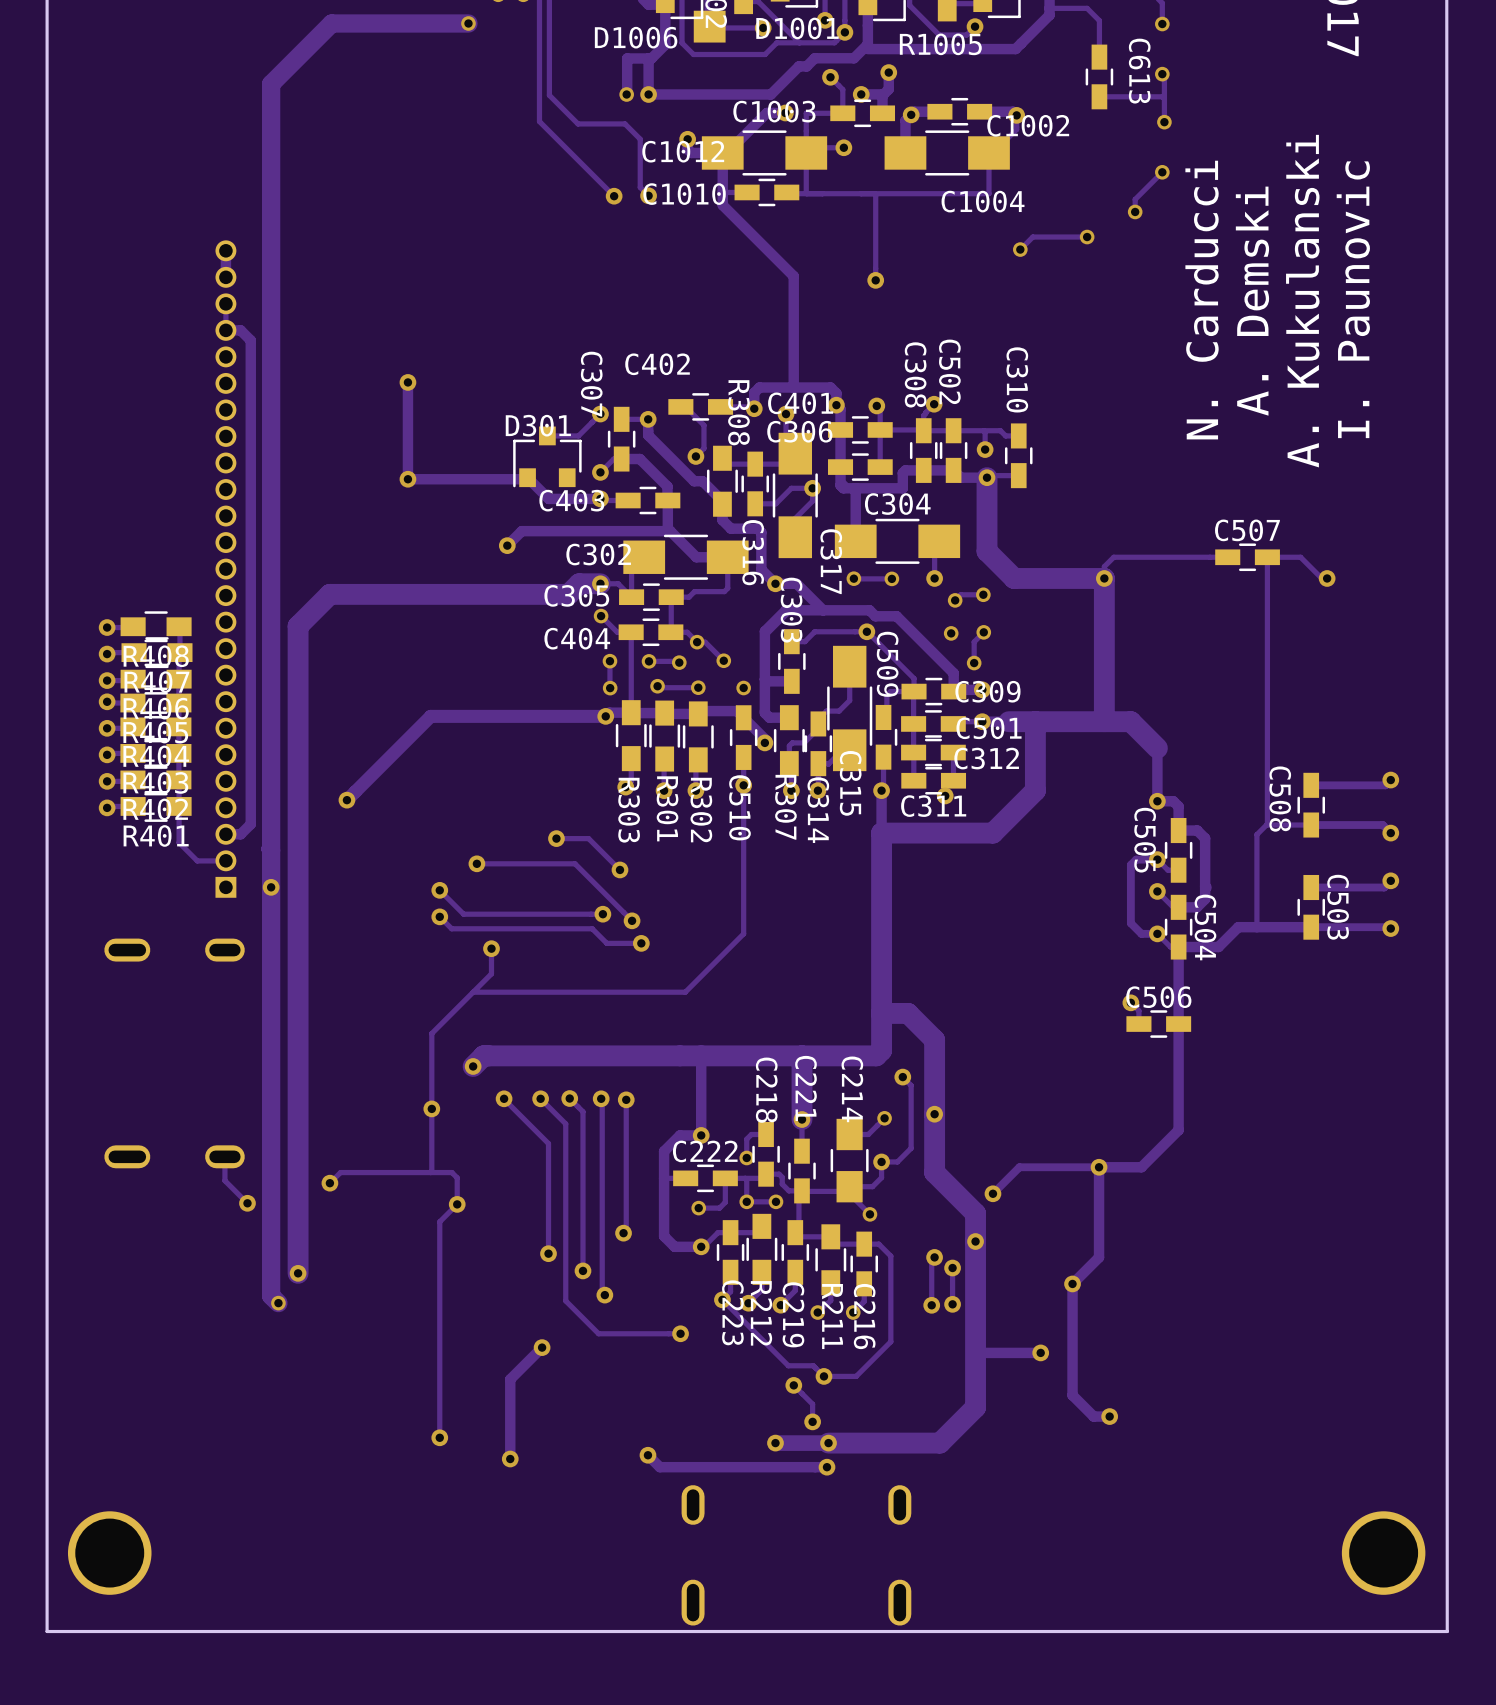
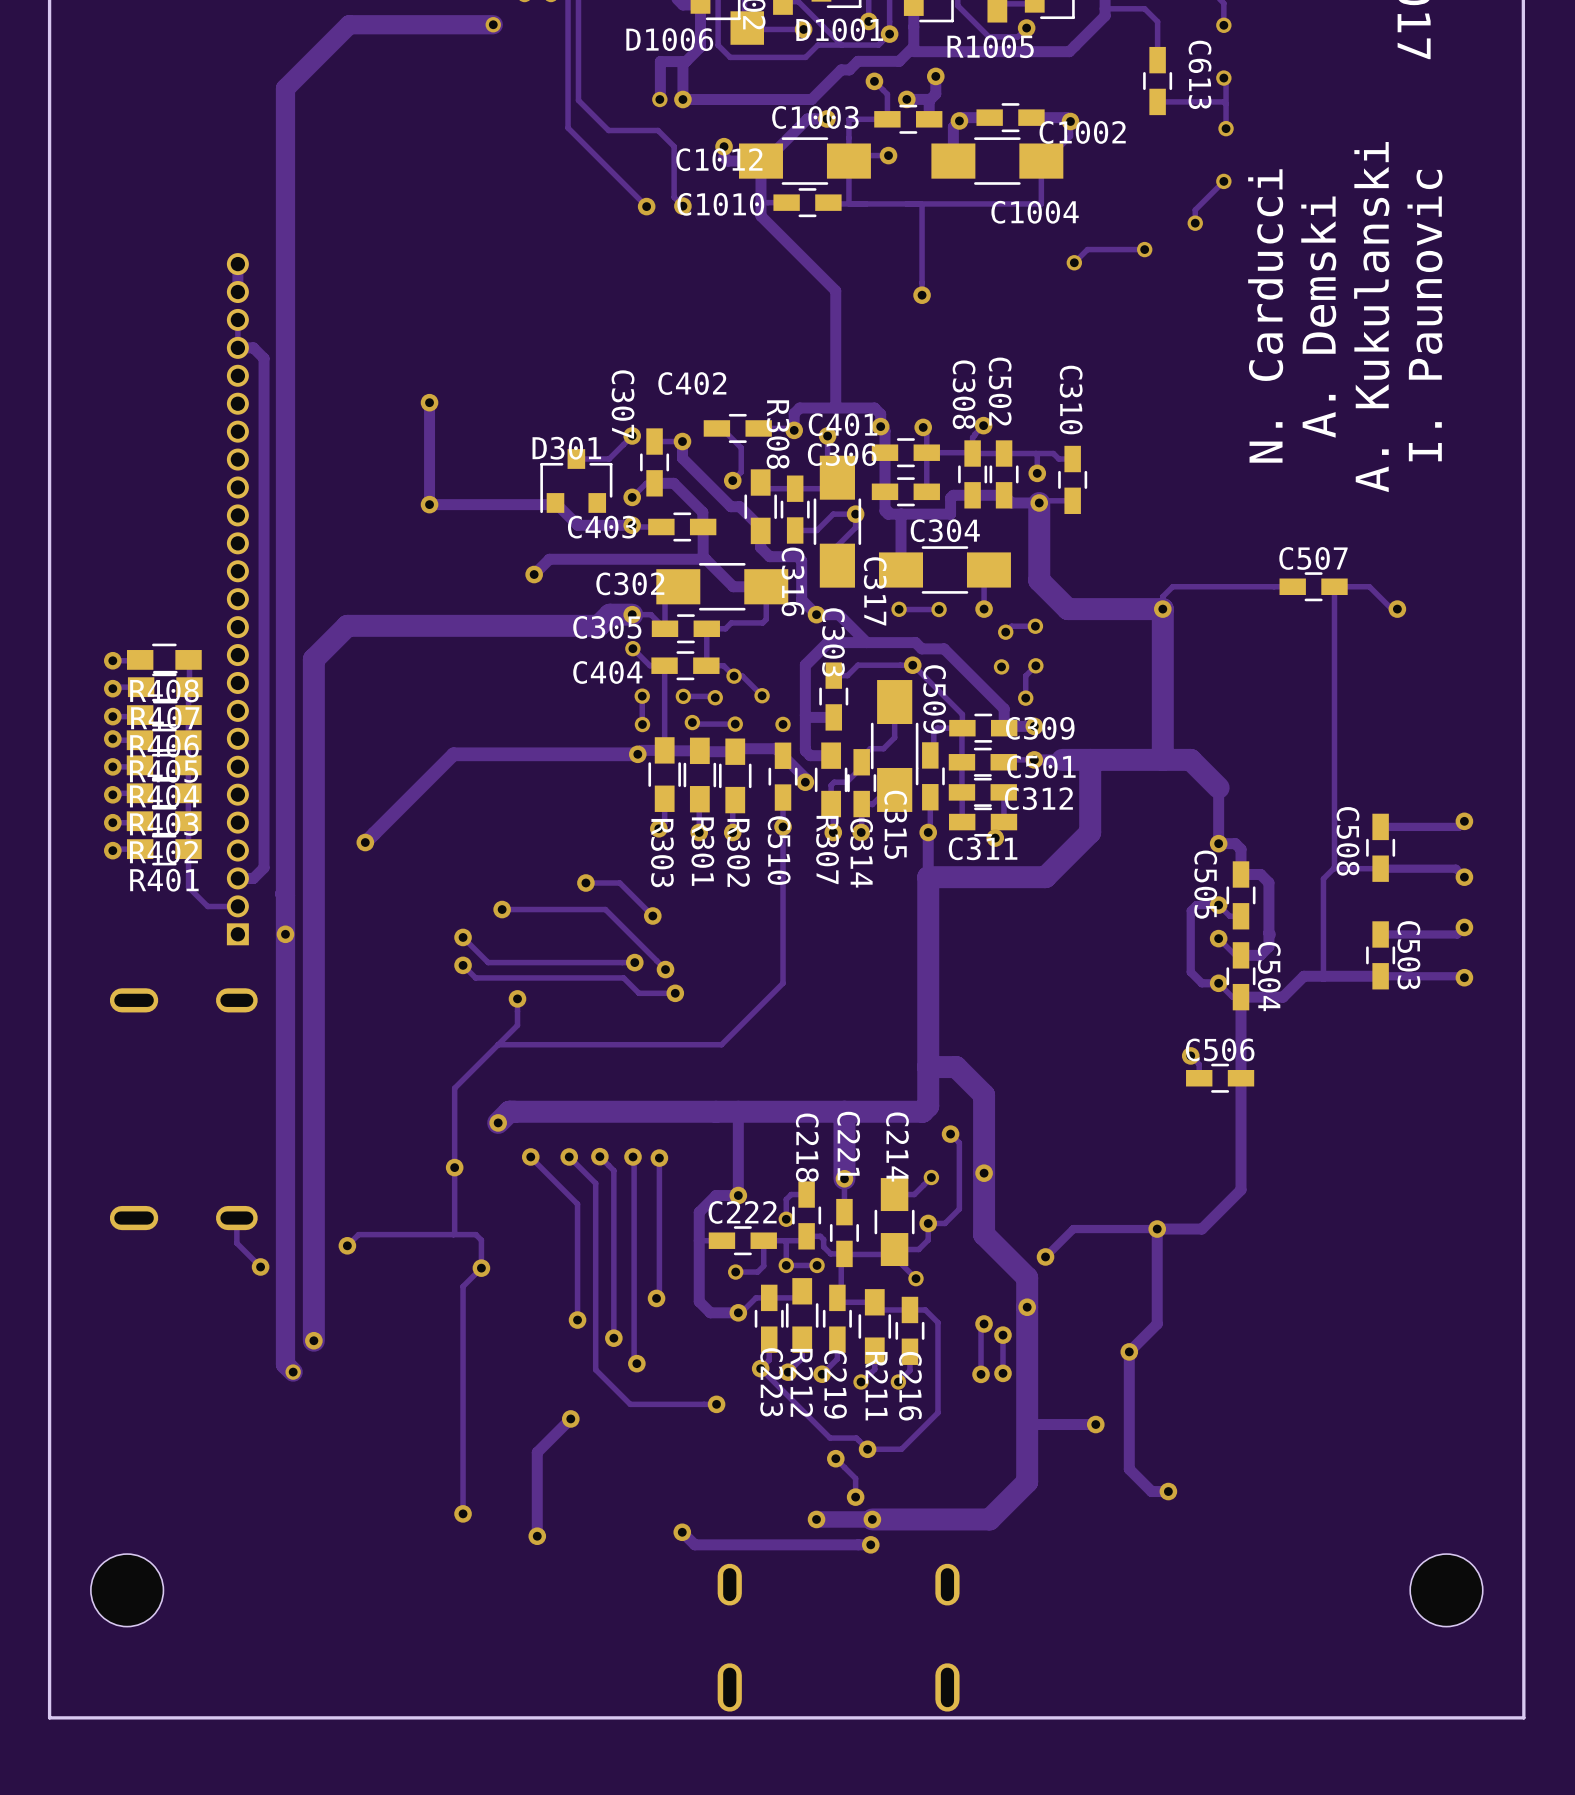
part: none -> (127, 1590)
part: none -> (1446, 1590)
part: (109, 1553) -> none
part: (1383, 1553) -> none

